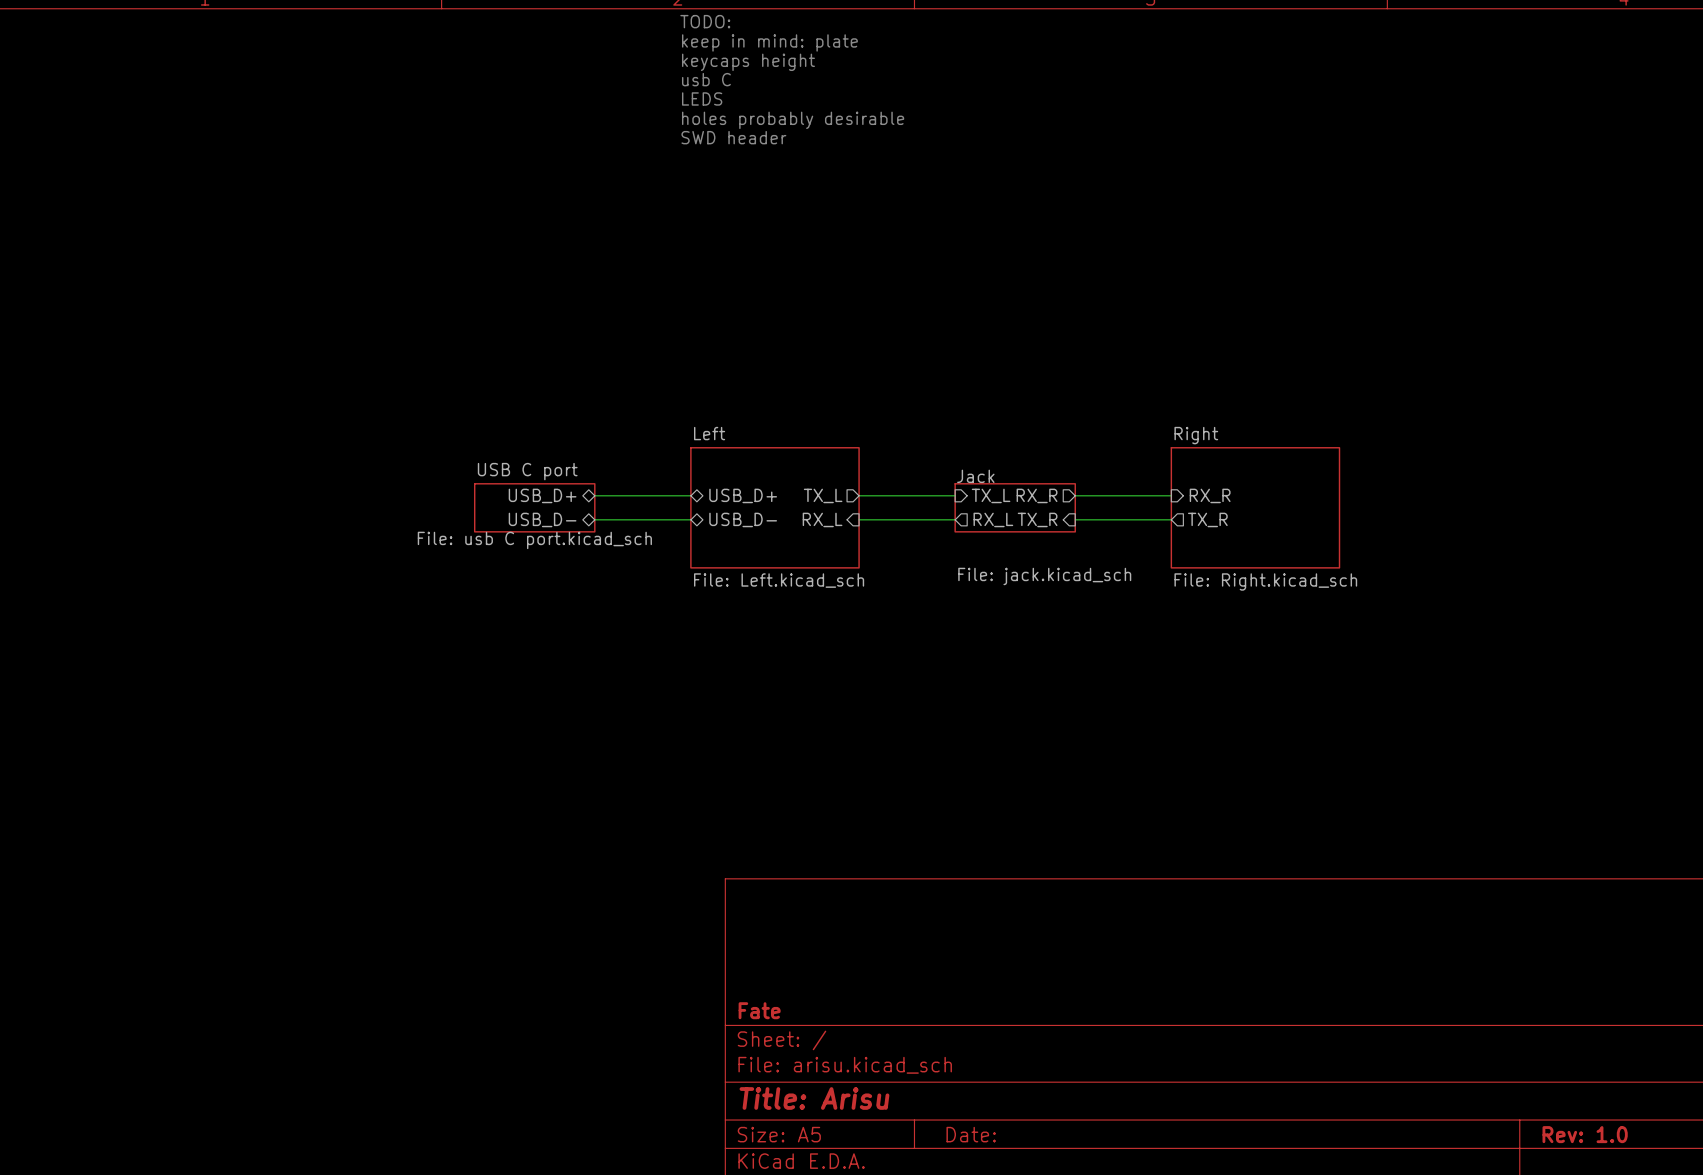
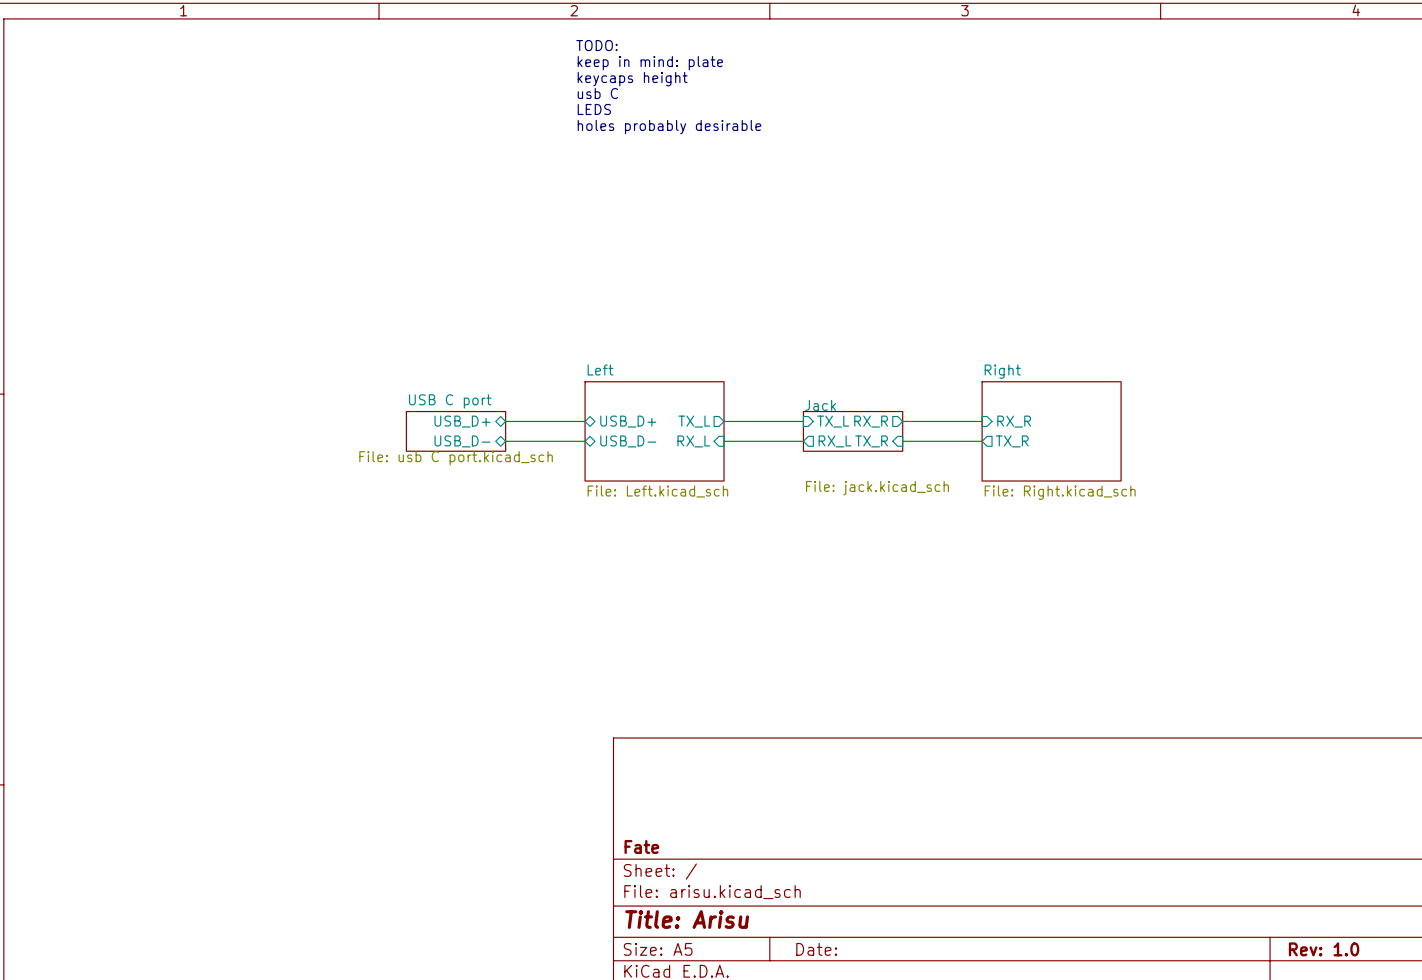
text: TODO: (705, 21) -> none
text: keep in mind: plate (769, 42) -> TODO: (596, 45)
text: keycaps height (748, 62) -> keep in mind: plate (650, 63)
text: usb C (706, 79) -> keycaps height (632, 79)
text: LEDS (702, 98) -> usb C (597, 93)
text: holes probably desirable (793, 120) -> LEDS (594, 109)
text: SWD header (733, 137) -> holes probably desirable (669, 127)

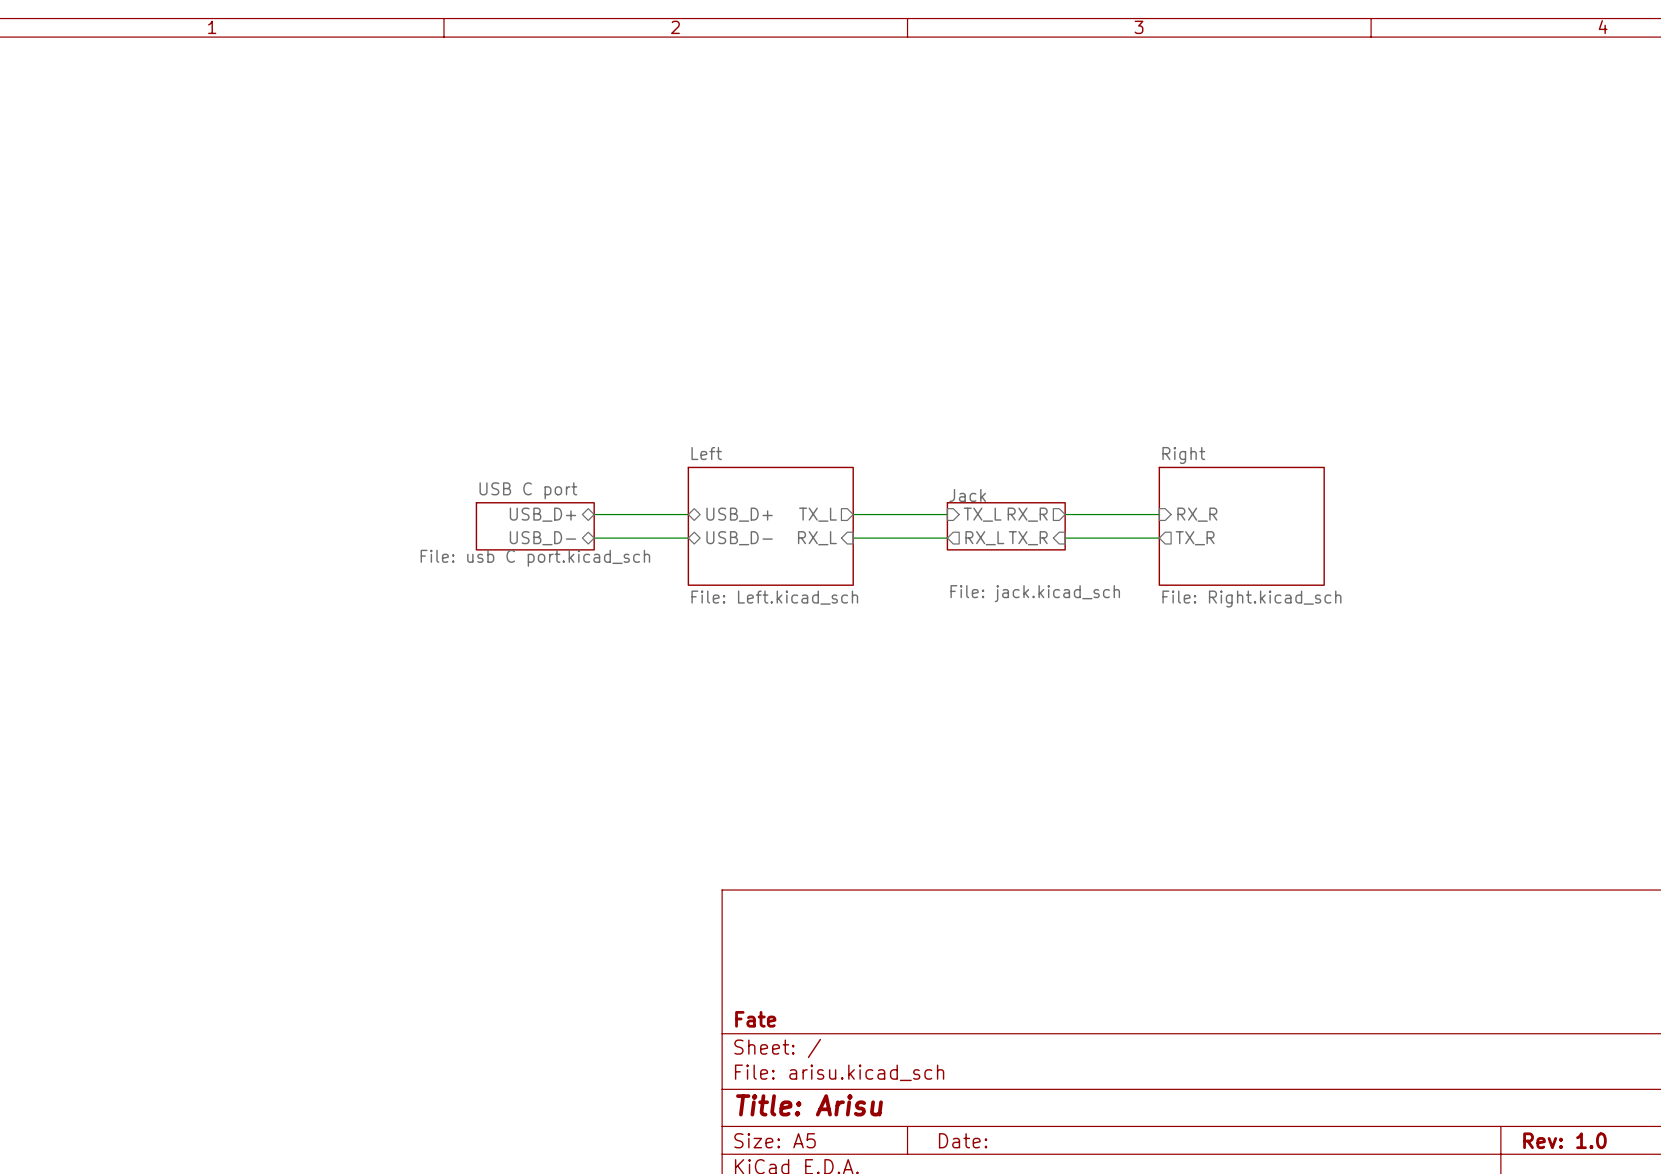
text: TODO: (596, 45) -> none
text: keep in mind: plate (650, 63) -> none
text: keycaps height (632, 79) -> none
text: usb C (597, 93) -> none
text: LEDS (594, 109) -> none
text: holes probably desirable (669, 127) -> none

